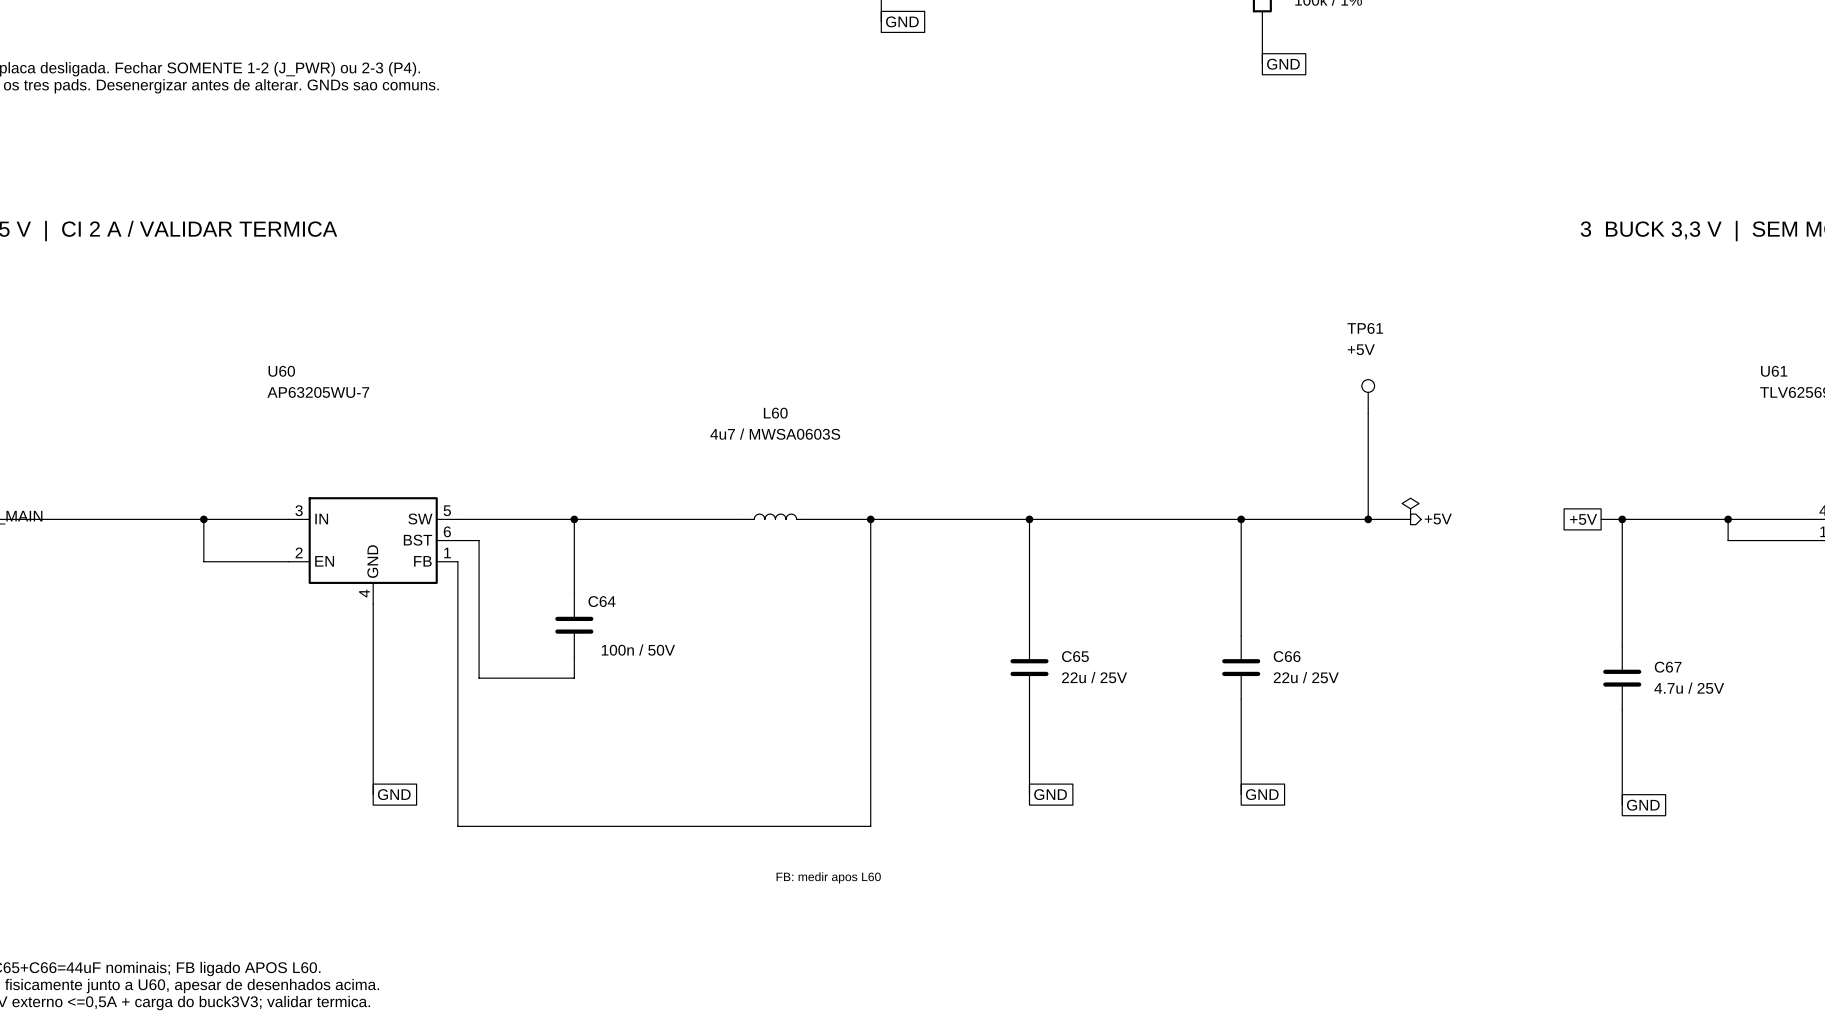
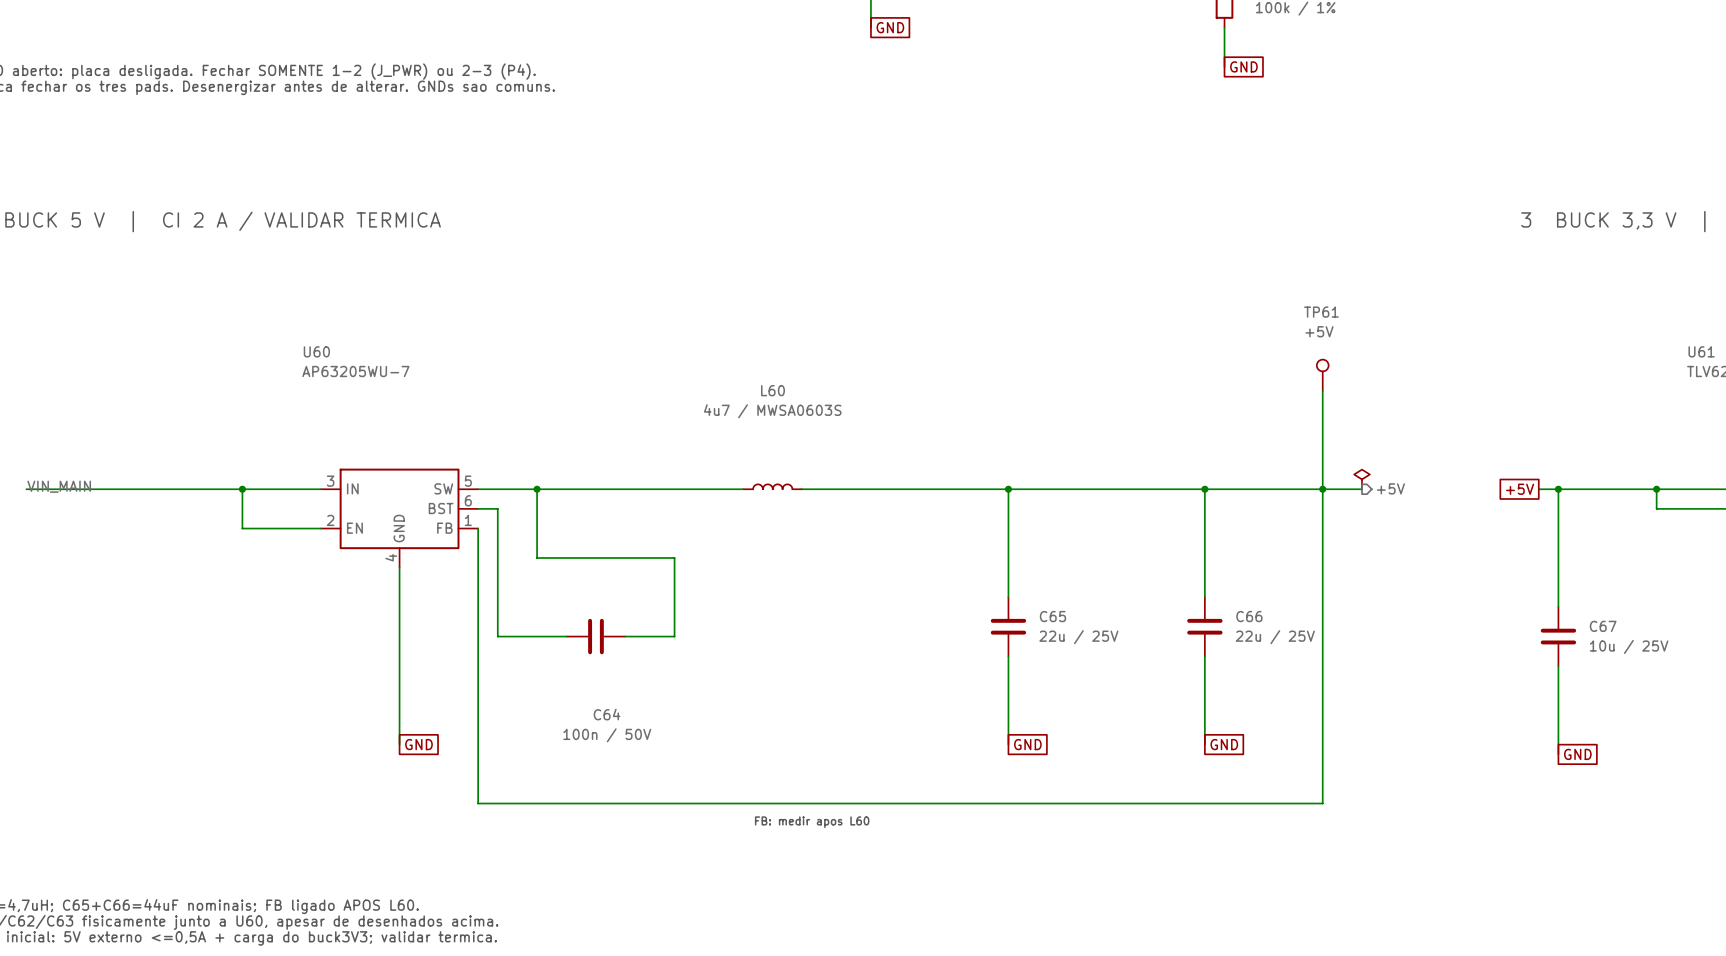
wire: none -> (537, 489) (537, 557) (674, 557) (674, 636) (625, 636)
junction: none -> (537, 489)
wire: (574, 519) (574, 593) -> none
junction: (574, 519) -> none
wire: (870, 519) (870, 826) (457, 826) -> (1322, 489) (1322, 803) (478, 803) (478, 774)
junction: (870, 519) -> none
C64 name position: C64 (602, 601) -> C64 (607, 714)
C64 rotation: 0° (574, 625) -> 90° clockwise (595, 636)
C64 position: (574, 625) -> (595, 636)
C64 value position: 100n / 50V (638, 650) -> 100n / 50V (607, 735)
C67 value: 4.7u / 25V (1689, 688) -> 10u / 25V (1629, 646)

